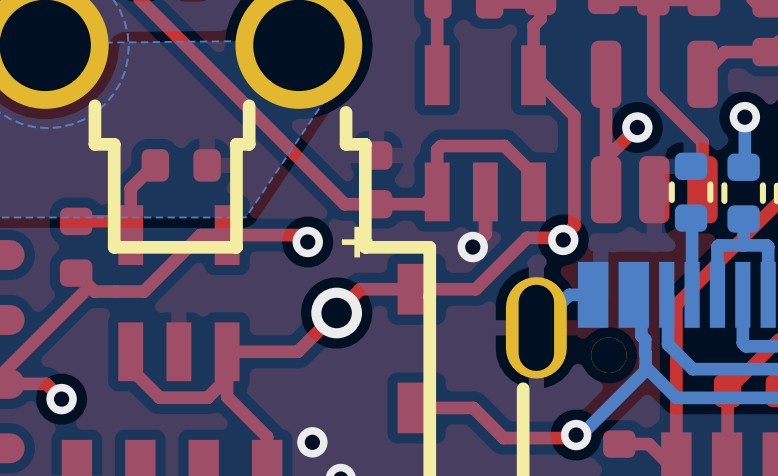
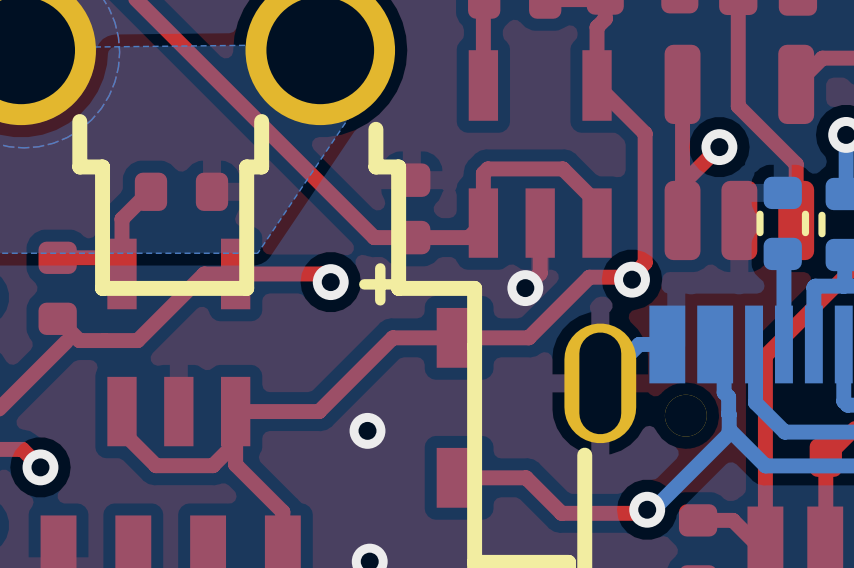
via: (336, 313) -> none
via position: (312, 442) -> (367, 430)

